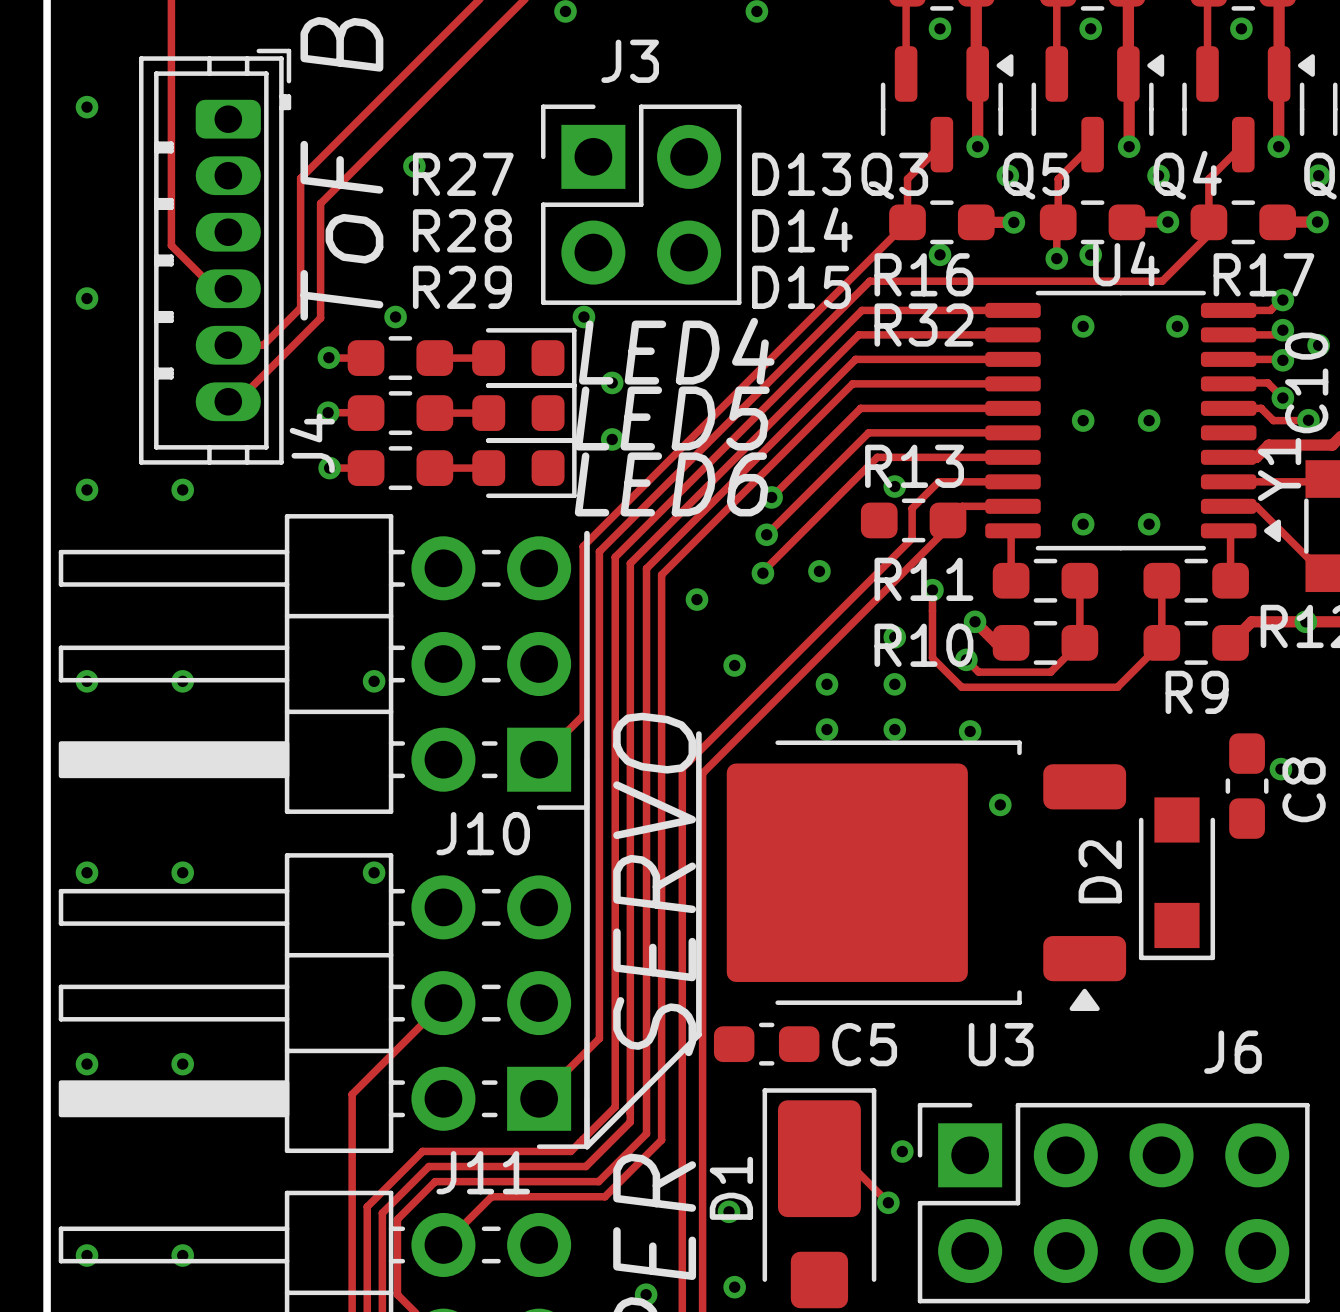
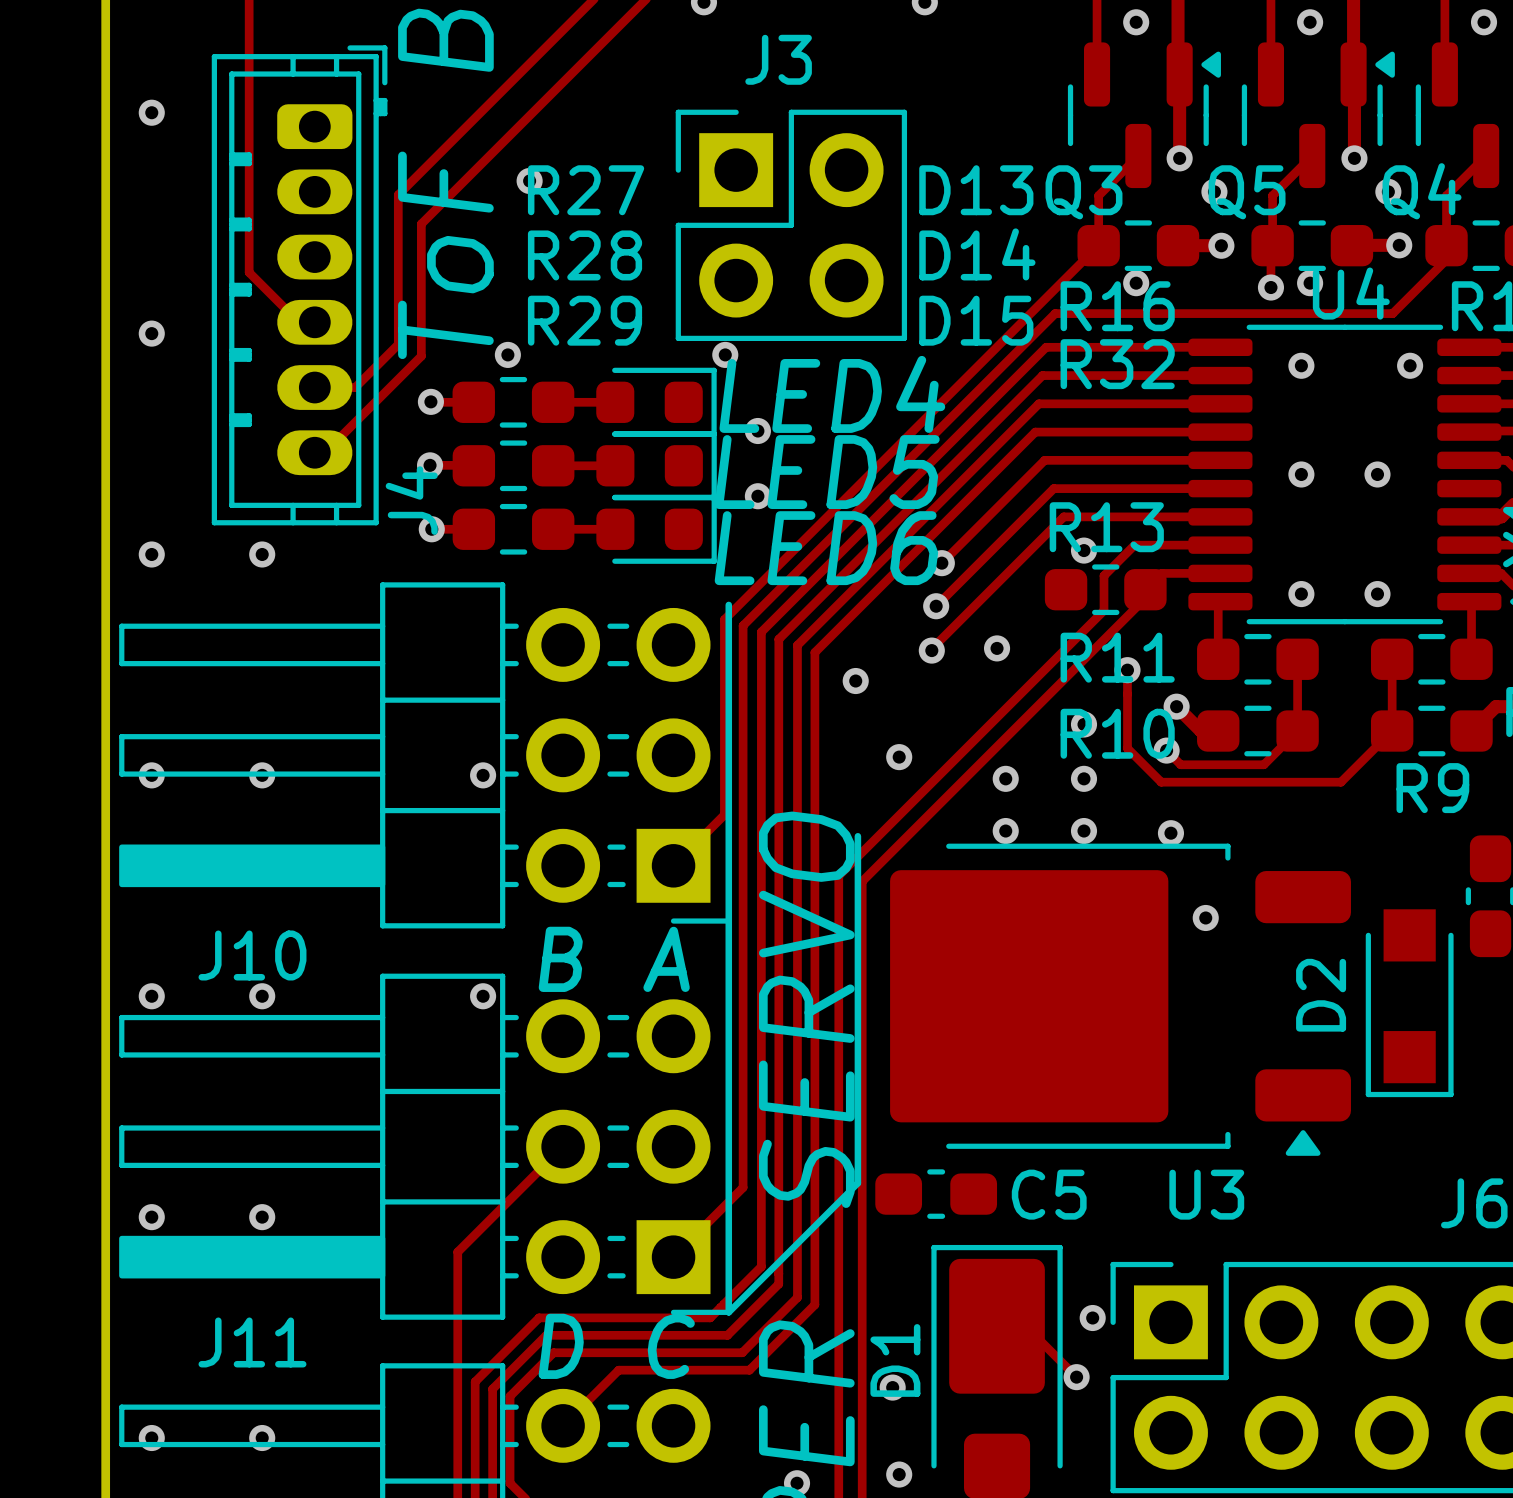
J10 name position: J10 (483, 833) -> J10 (252, 955)
text: none -> B (560, 959)
text: none -> A (666, 959)
J11 name position: J11 (483, 1172) -> J11 (252, 1342)
text: none -> D (561, 1346)
text: none -> C (671, 1346)

